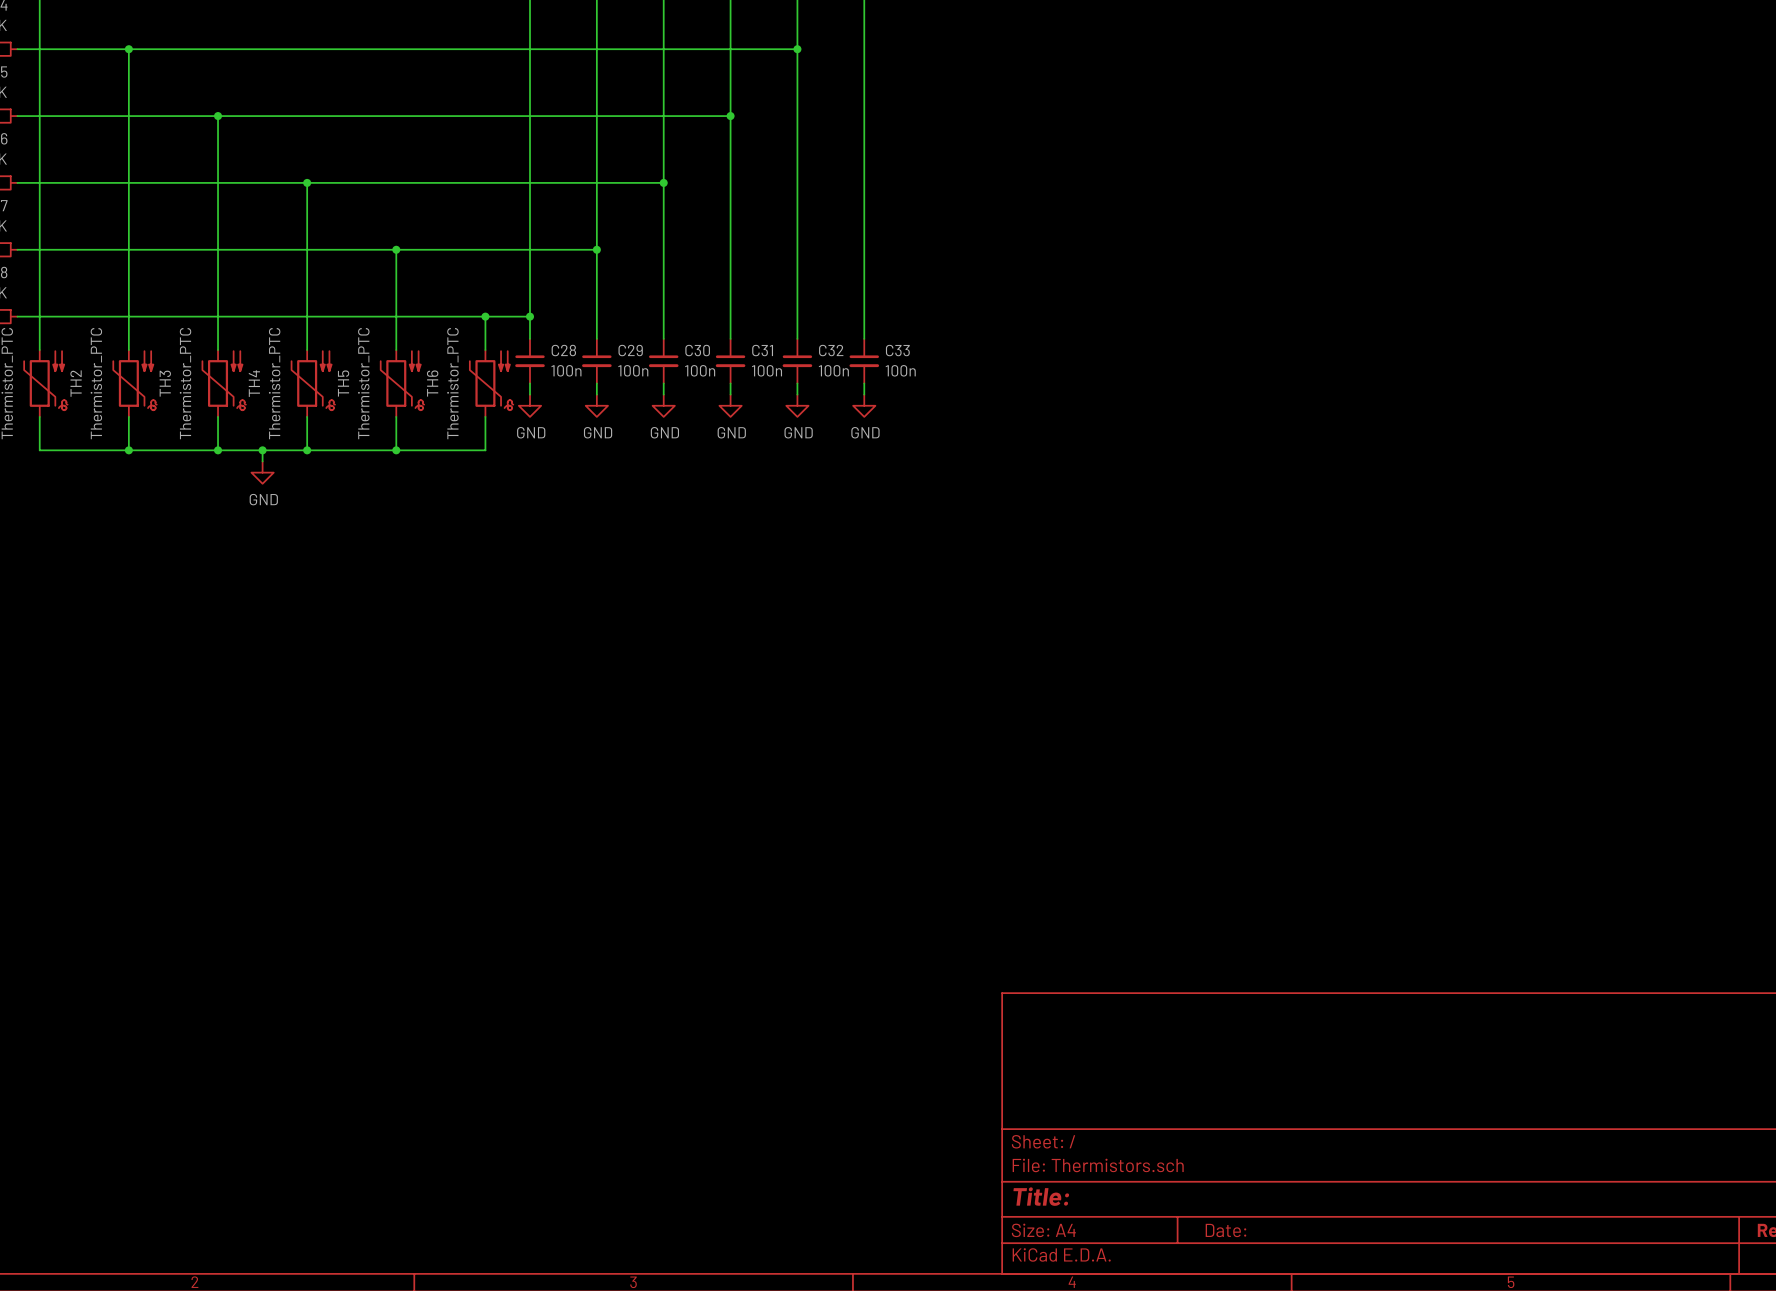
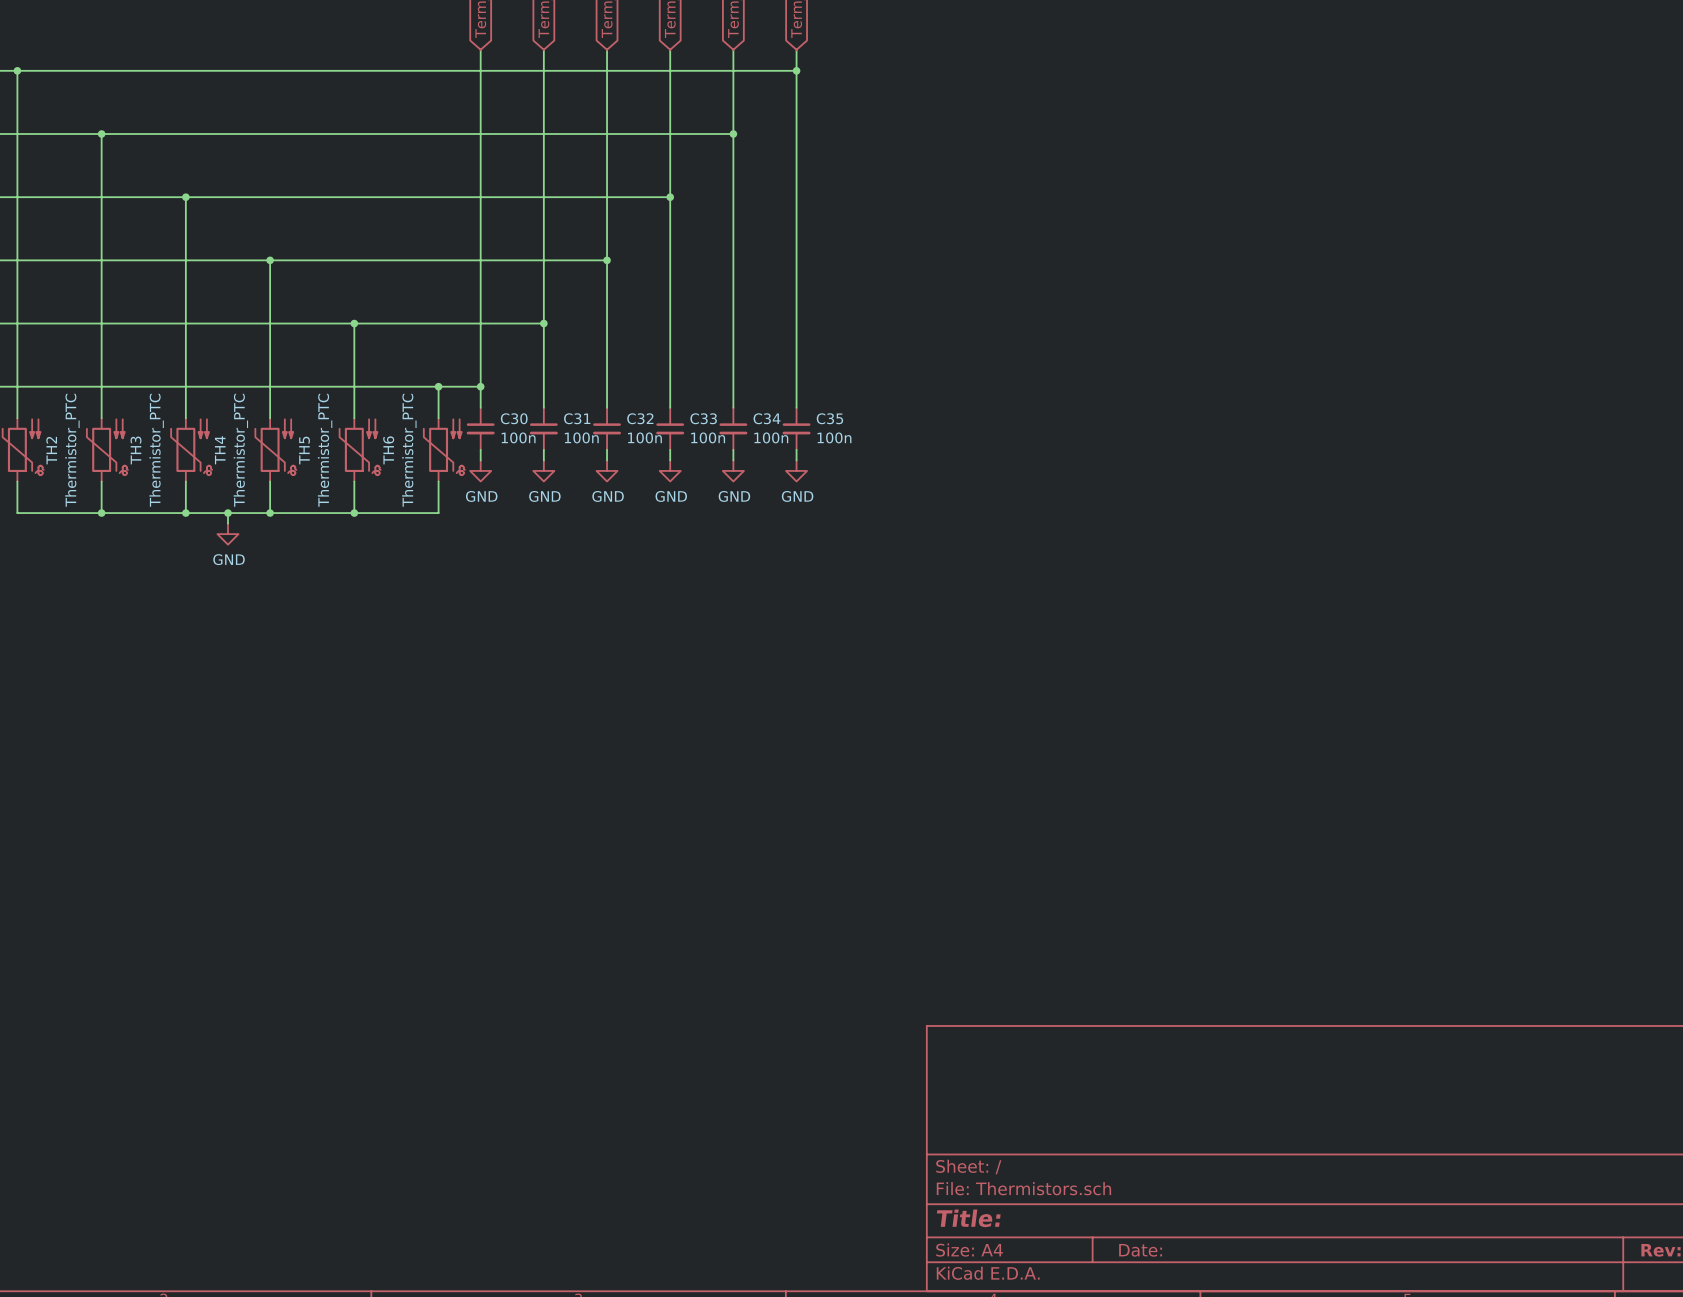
C28 name: C28 (563, 350) -> C30 (514, 418)
C29 name: C29 (630, 350) -> C31 (577, 418)
C30 name: C30 (697, 350) -> C32 (640, 418)
C31 name: C31 (762, 350) -> C33 (703, 418)
C32 name: C32 (831, 350) -> C34 (766, 418)
C33 name: C33 (897, 350) -> C35 (829, 418)

